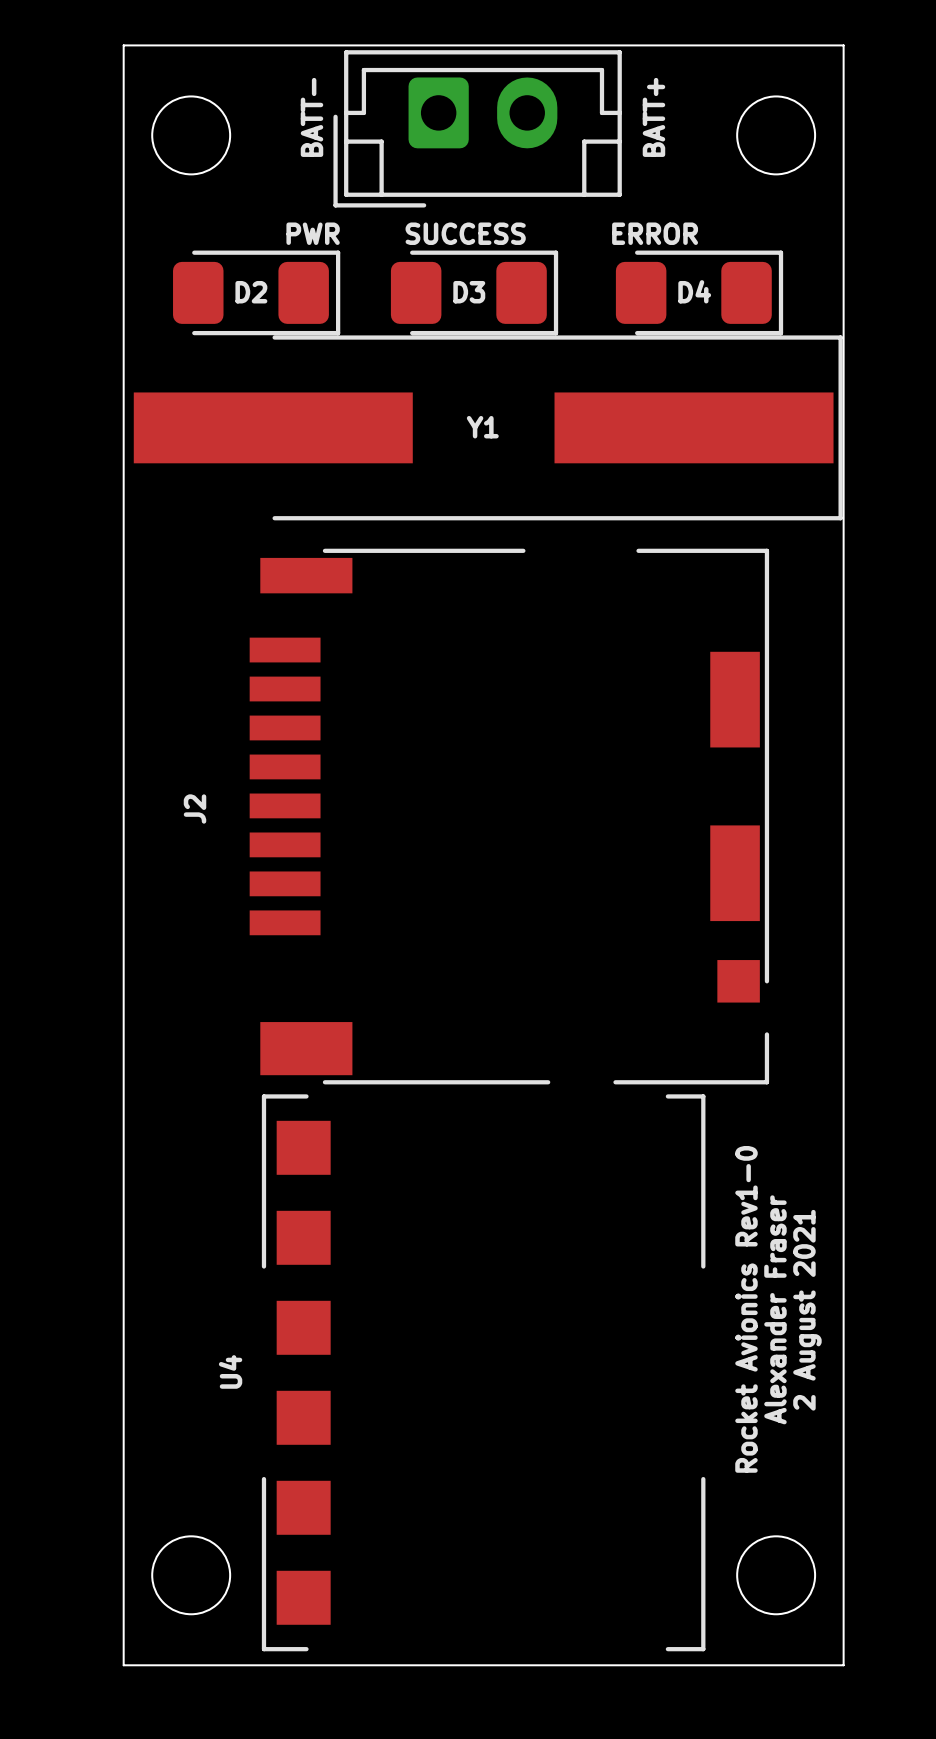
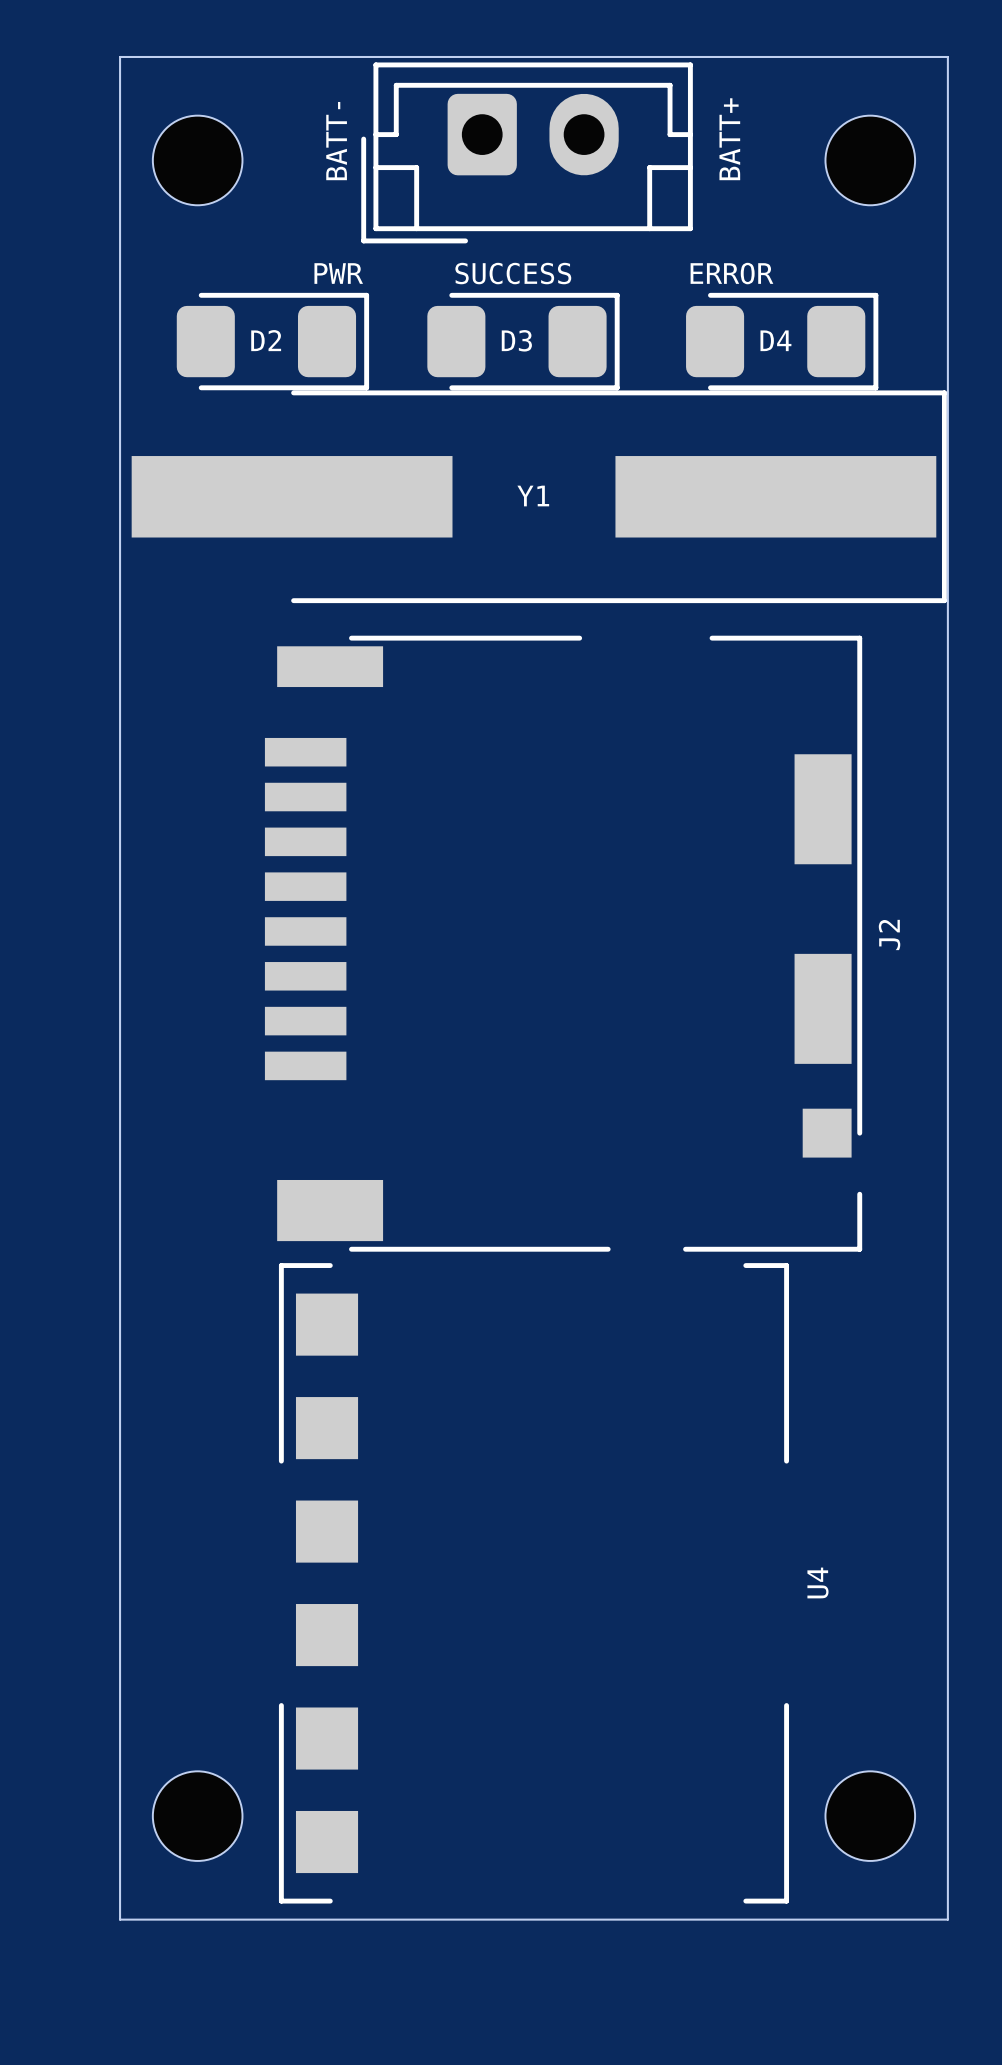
J2 name position: J2 (195, 809) -> J2 (889, 934)
text: Rocket Avionics Rev1-0 (746, 1309) -> none
text: Alexander Fraser (775, 1309) -> none
text: 2 August 2021 (807, 1310) -> none
U4 name position: U4 (230, 1371) -> U4 (817, 1582)

